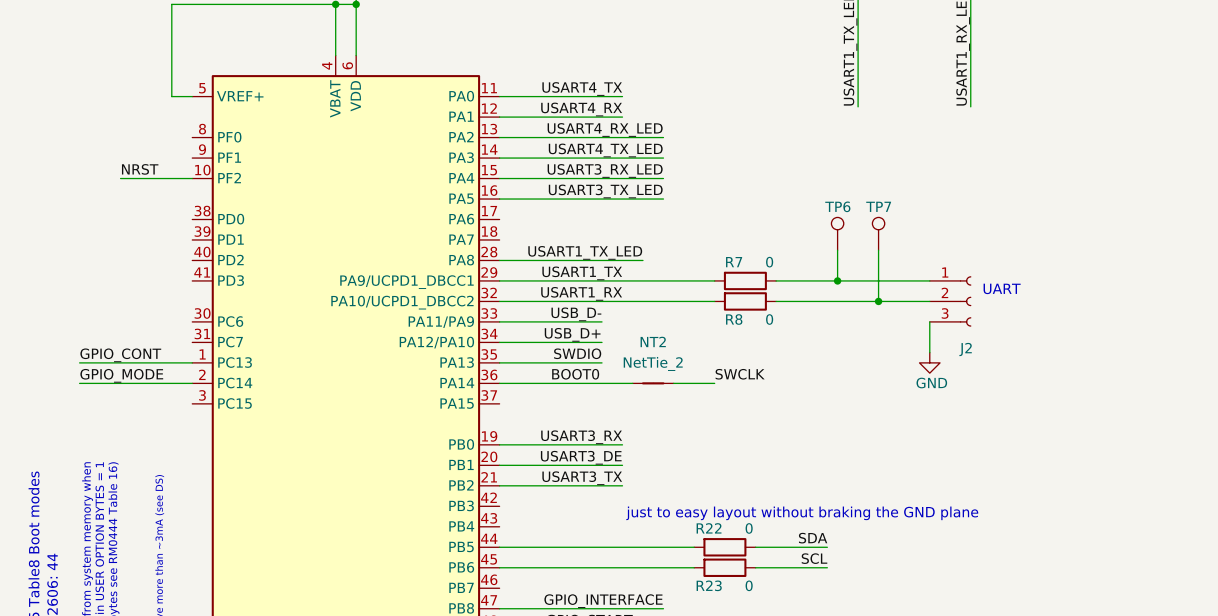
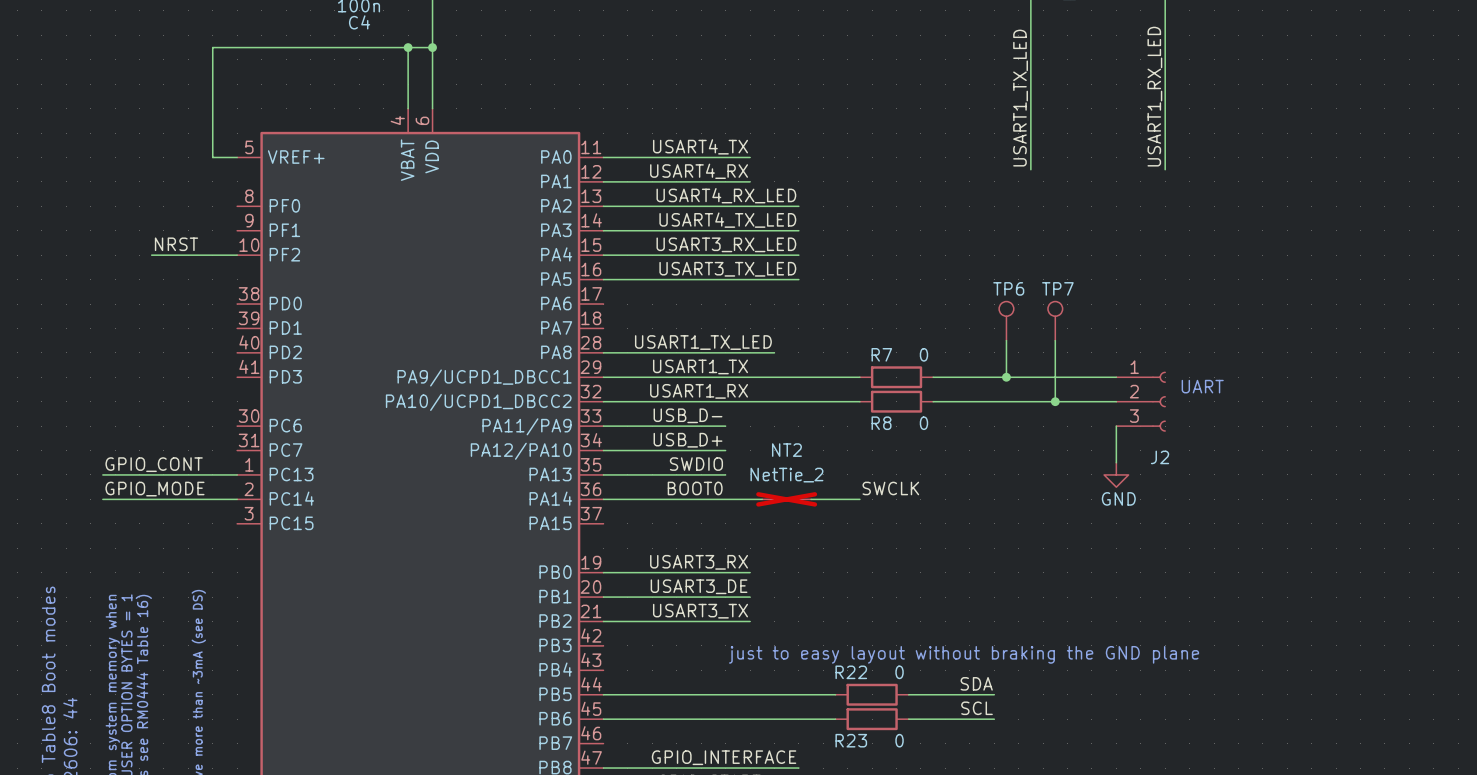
NT2 do-not-place cross: none -> (786, 499)

